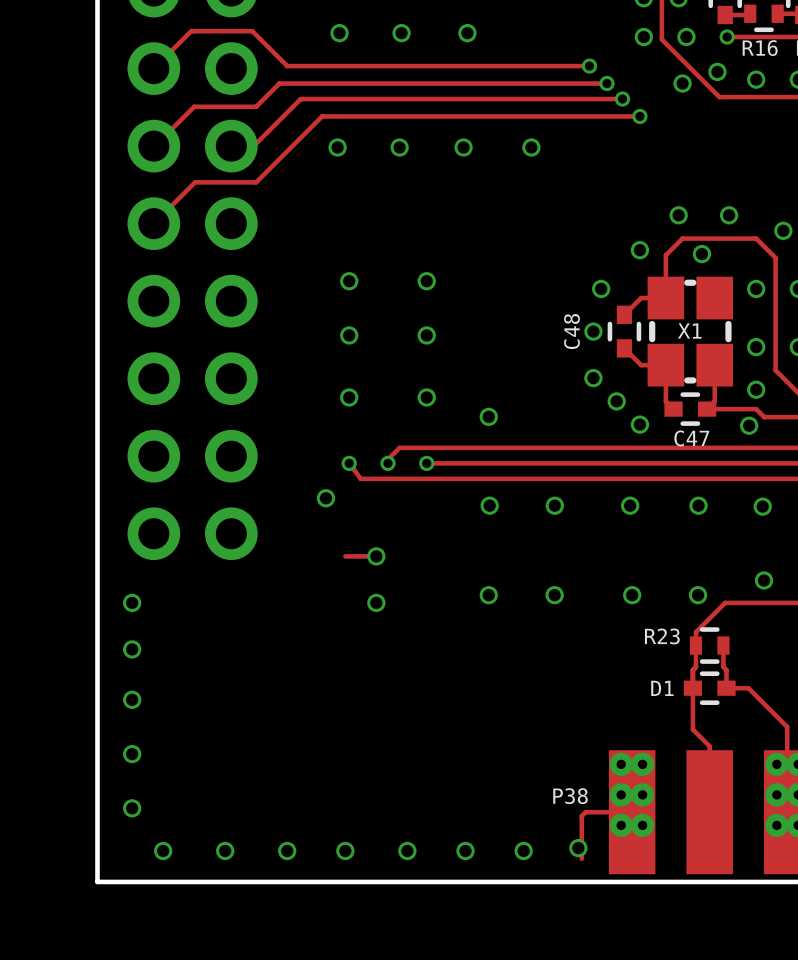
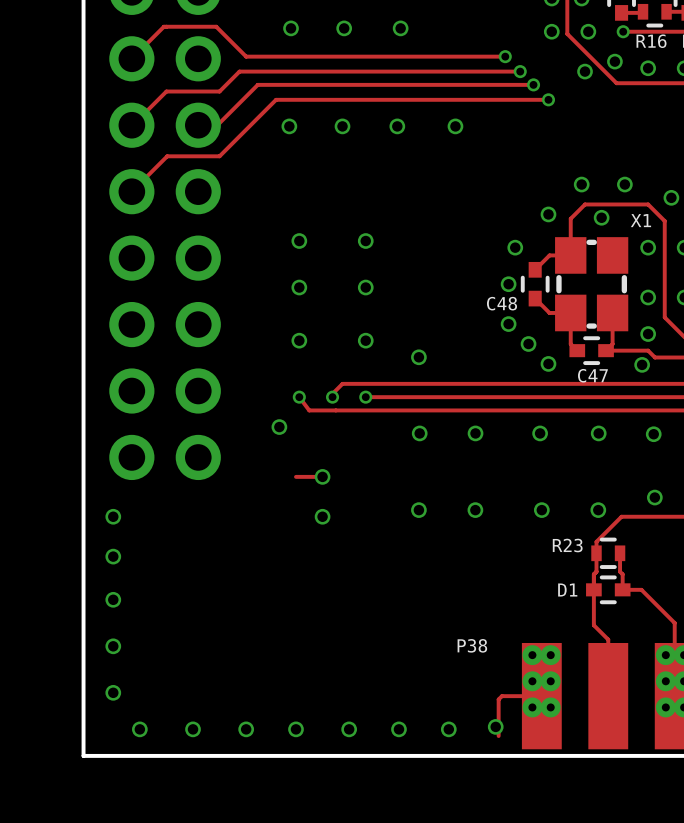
C48 name rotation: 0° (571, 331) -> 90° clockwise (502, 303)
X1 name position: X1 (689, 331) -> X1 (640, 220)
P38 name position: P38 (570, 796) -> P38 (472, 645)

